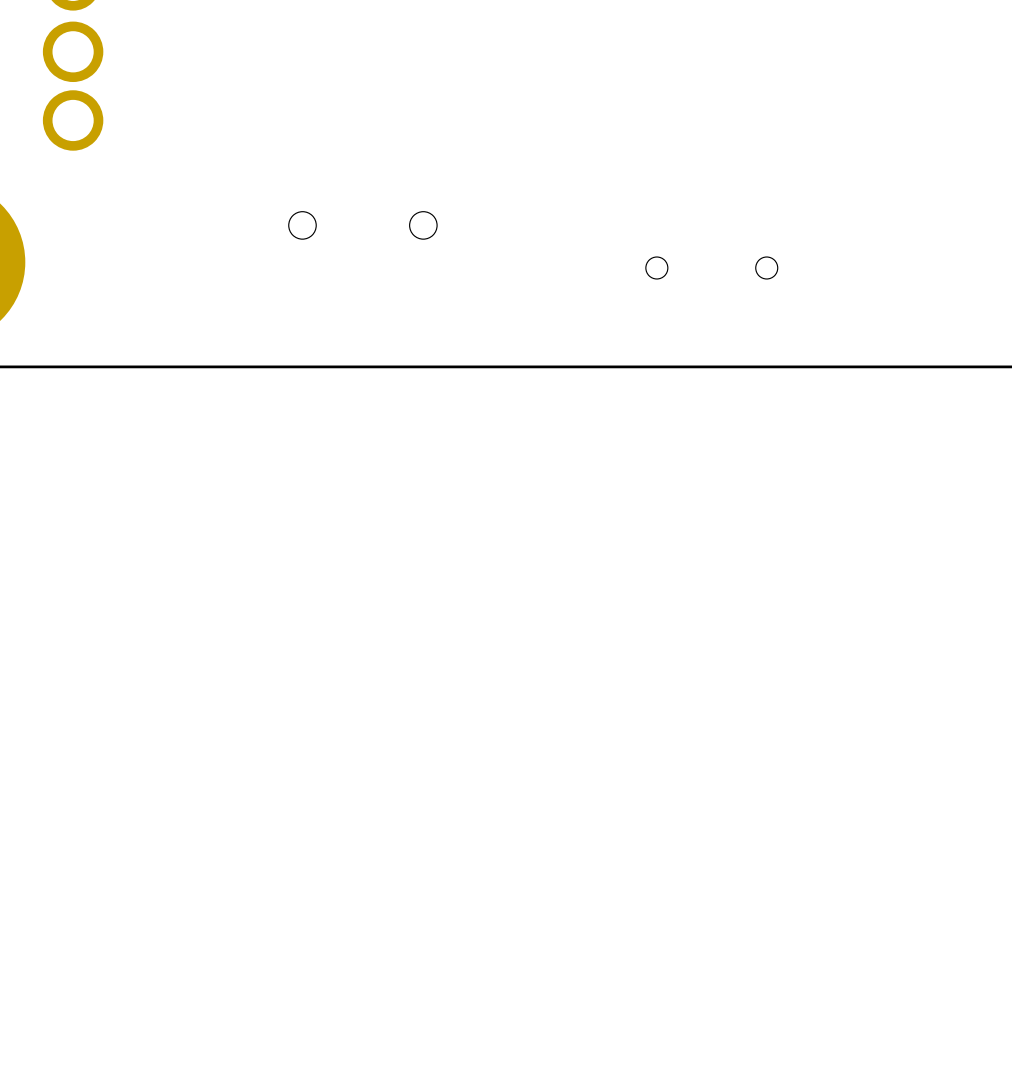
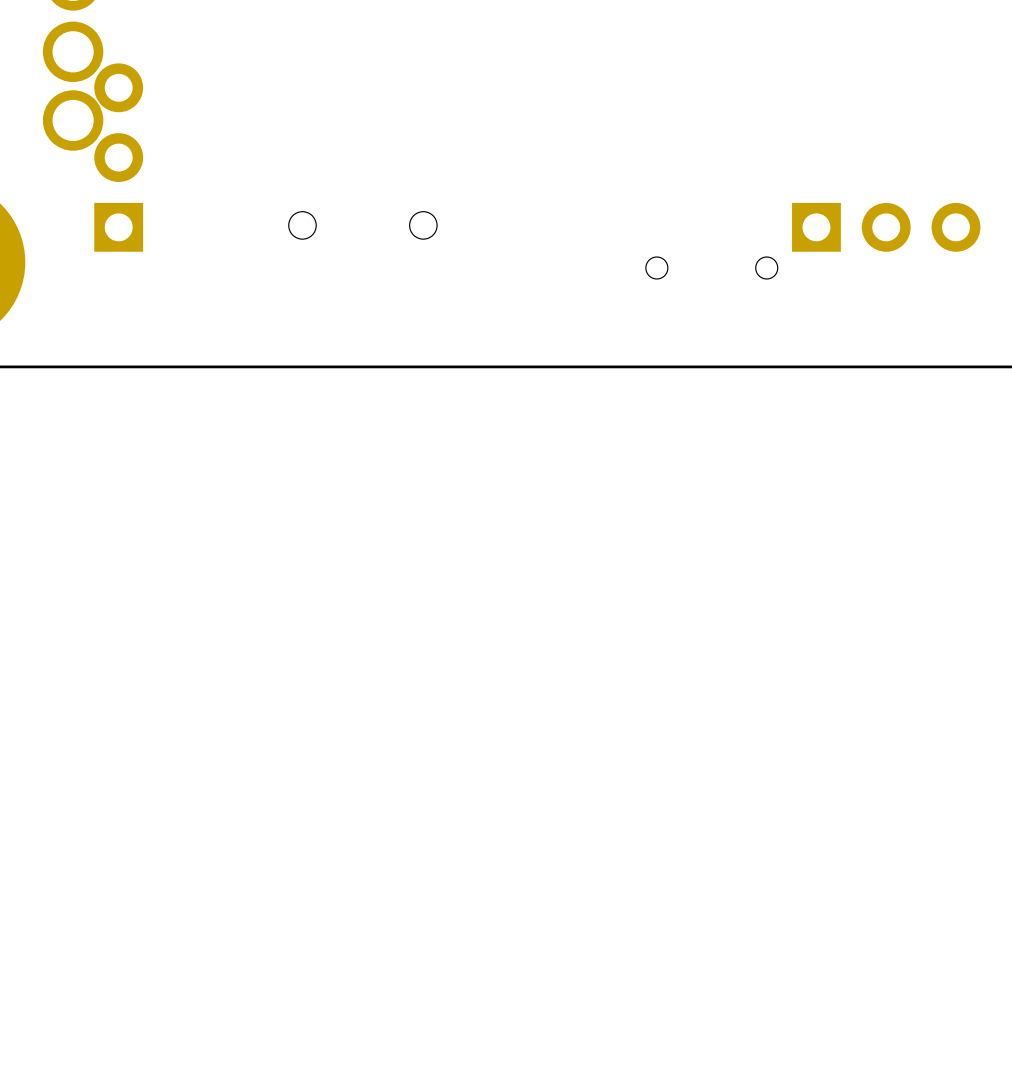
part: none -> (118, 157)
part: none -> (886, 227)

